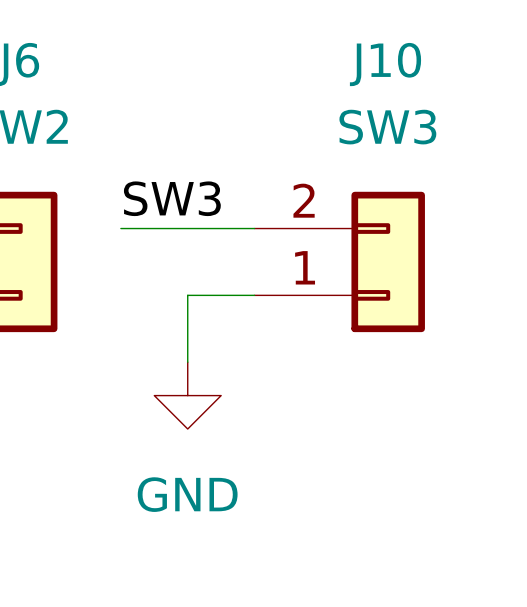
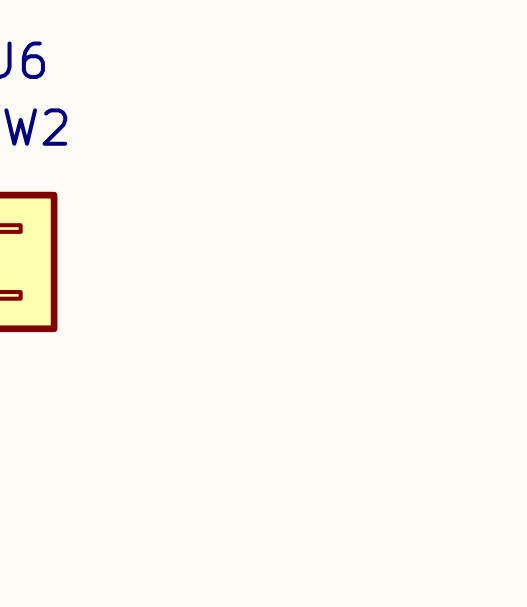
label: SW3 (172, 198) -> none
wire: (120, 228) (254, 228) -> none
J10: SW3 (339, 261) -> none
wire: (254, 295) (187, 295) (187, 362) -> none
power symbol: GND (187, 395) -> none

